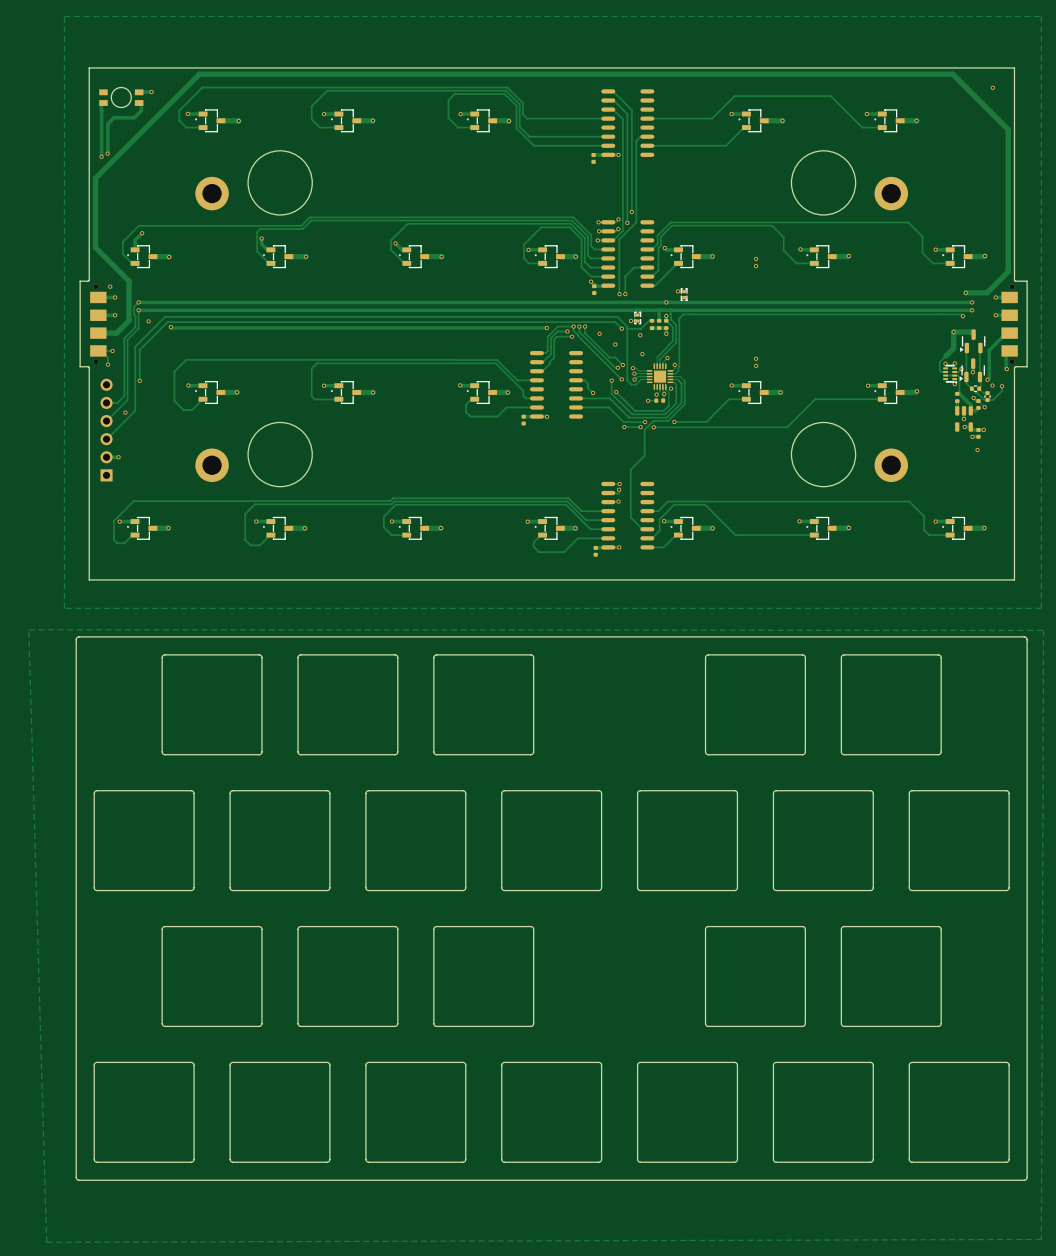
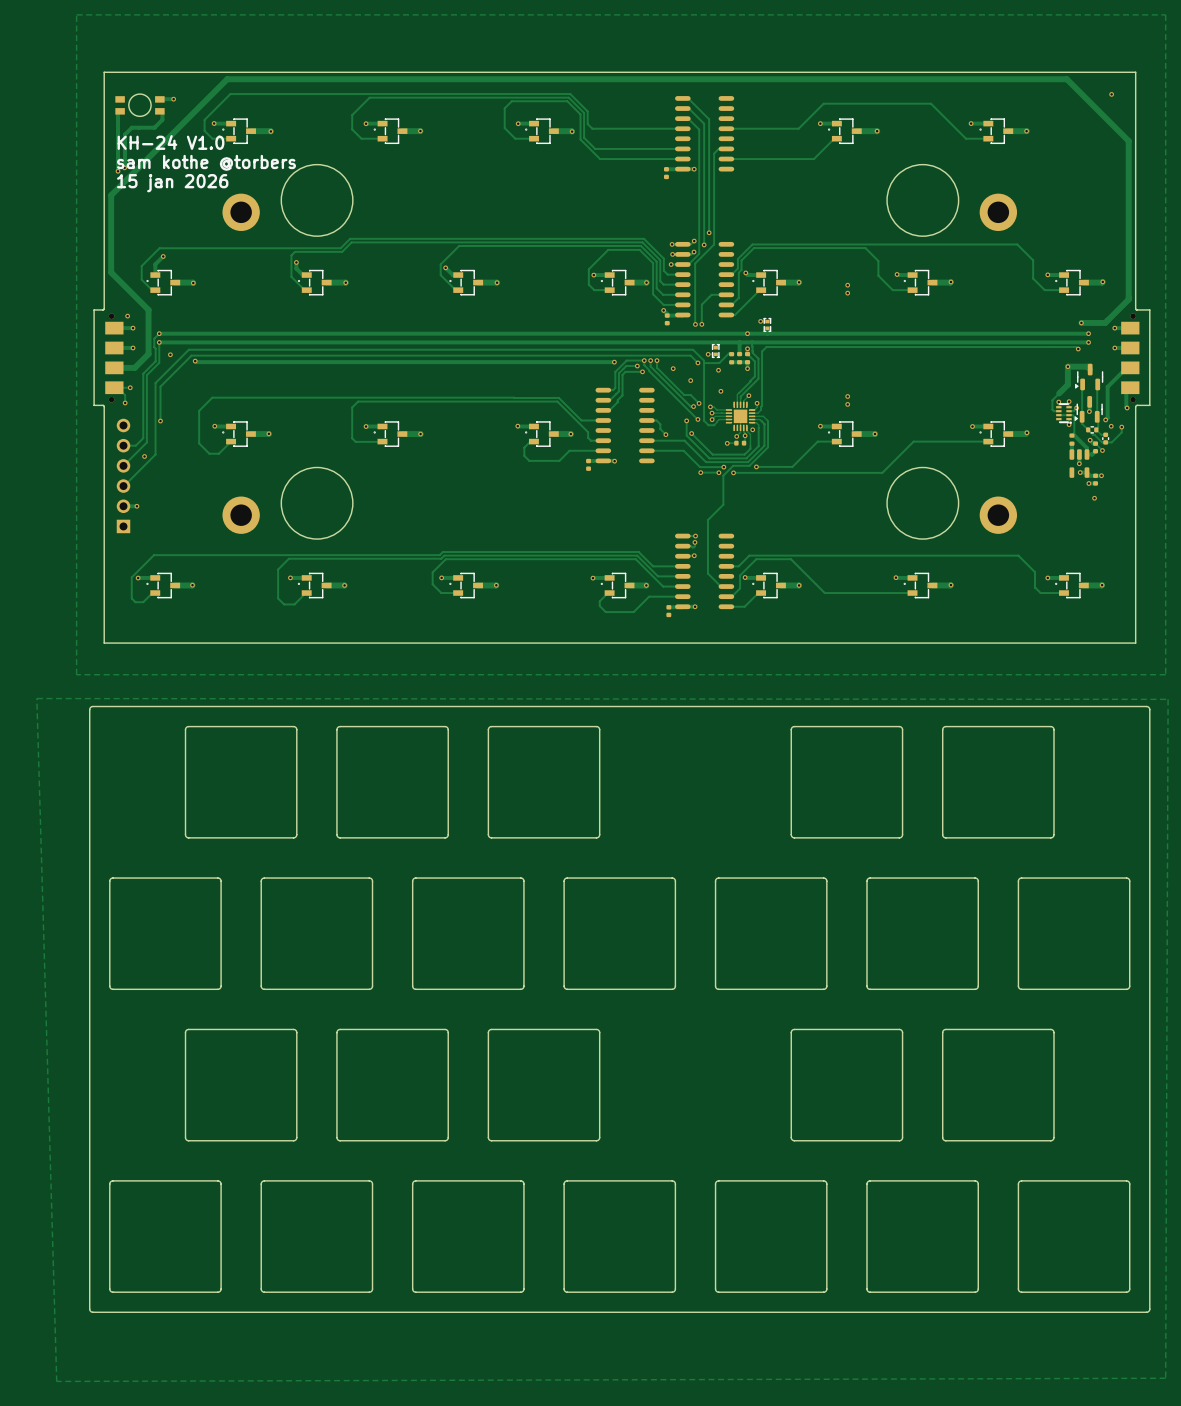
text: none -> KH-24 V1.0 (171, 142)
text: none -> sam kothe @torbers (206, 162)
text: none -> 15 jan 2026 (172, 183)

